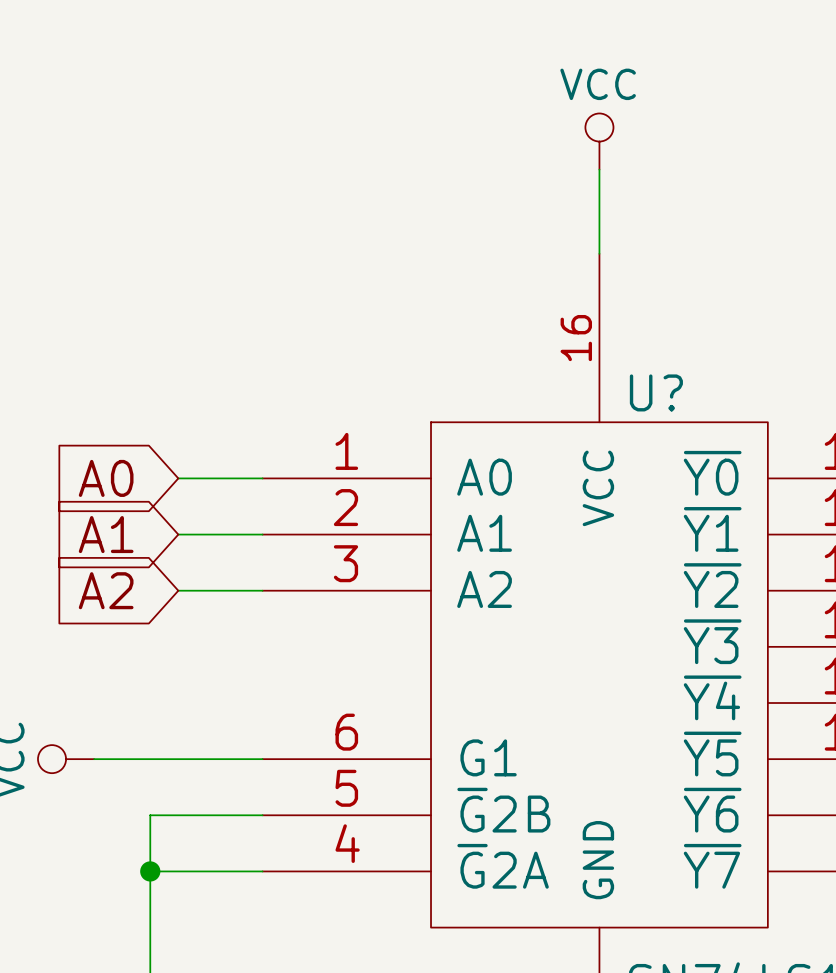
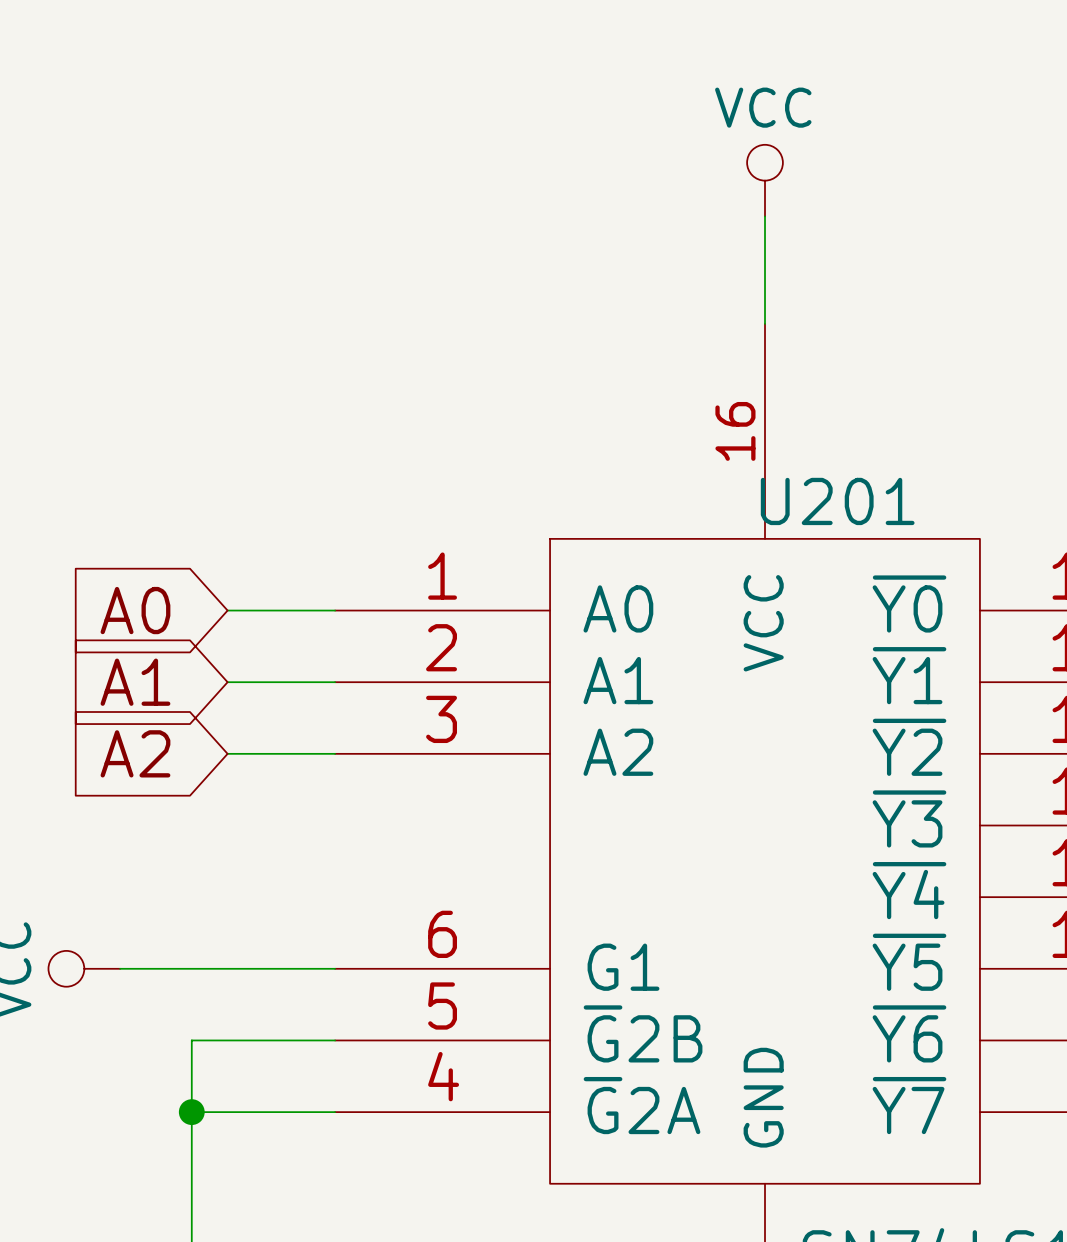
U? name: U? (656, 392) -> U201 (837, 501)

